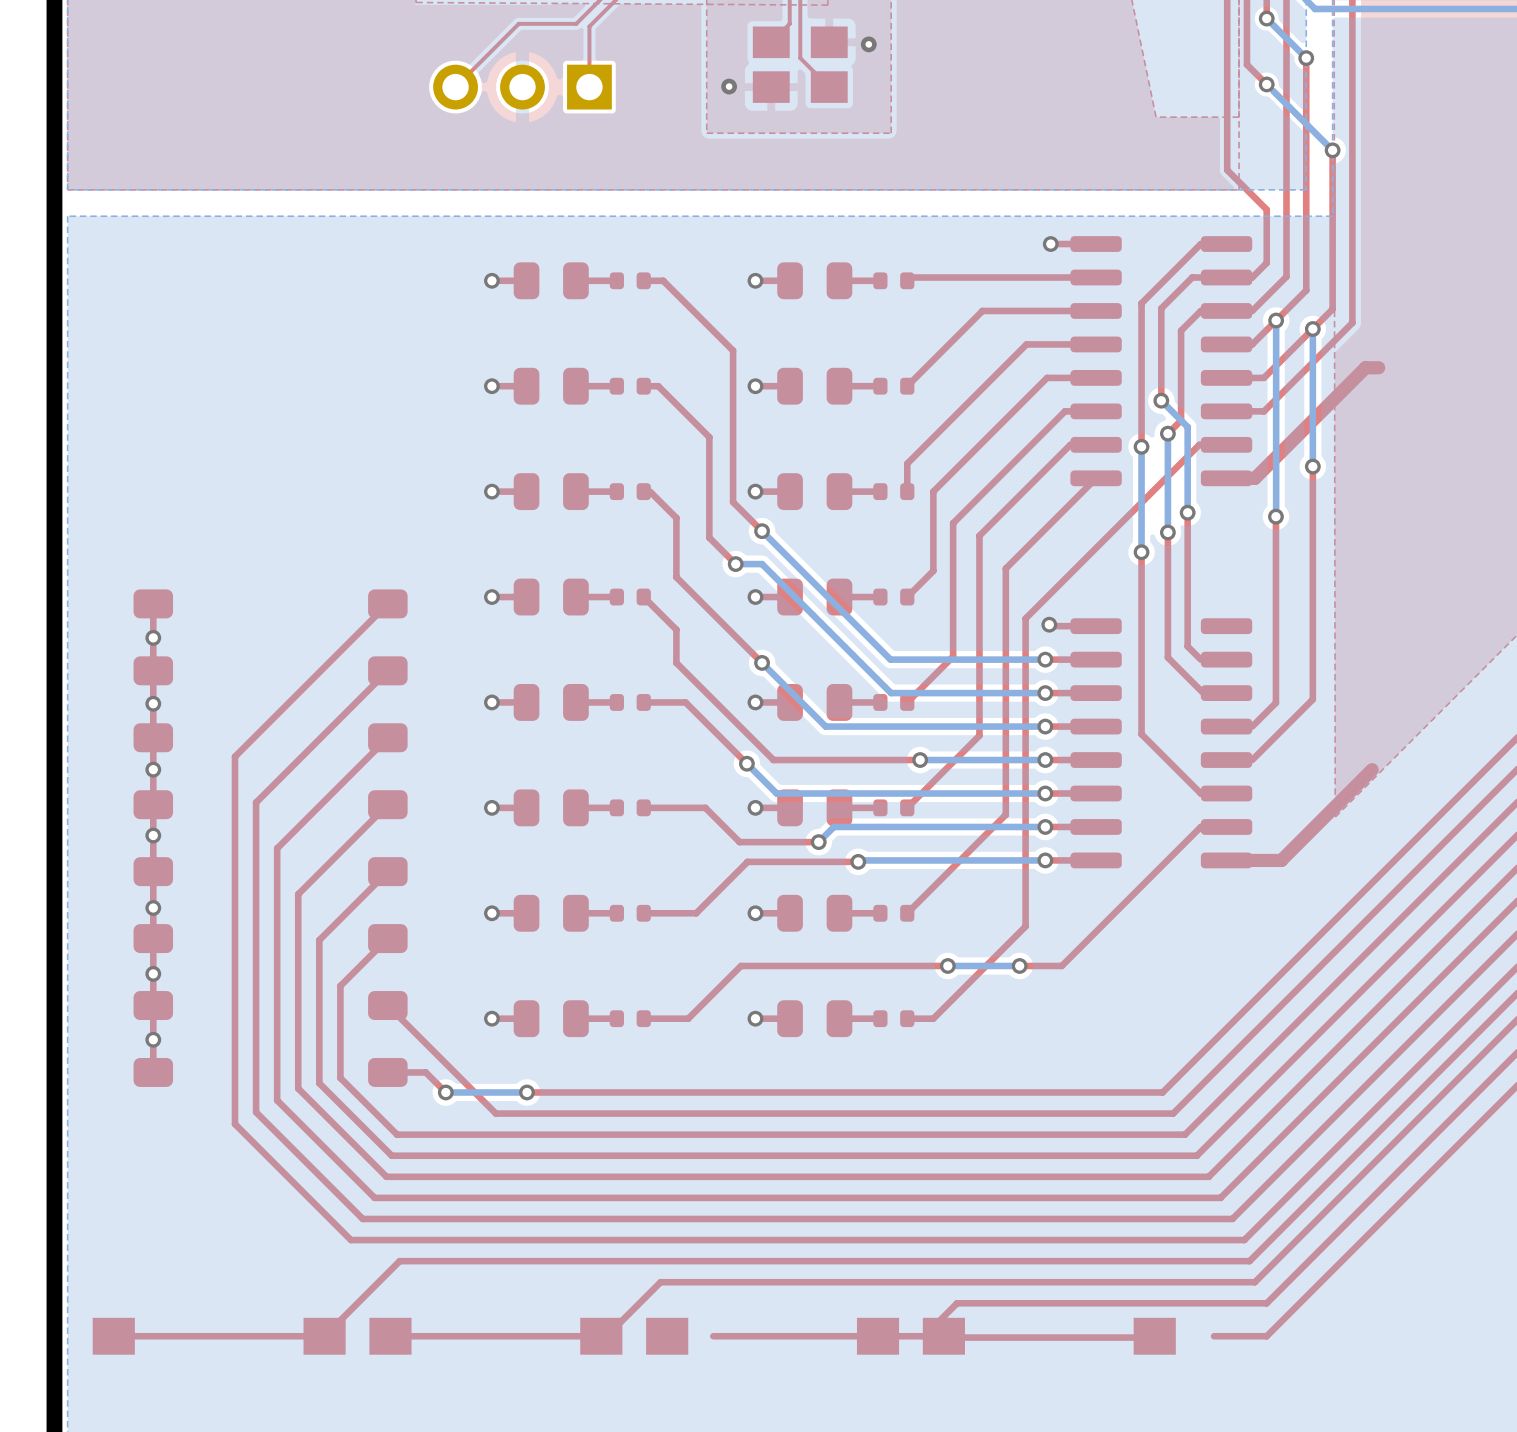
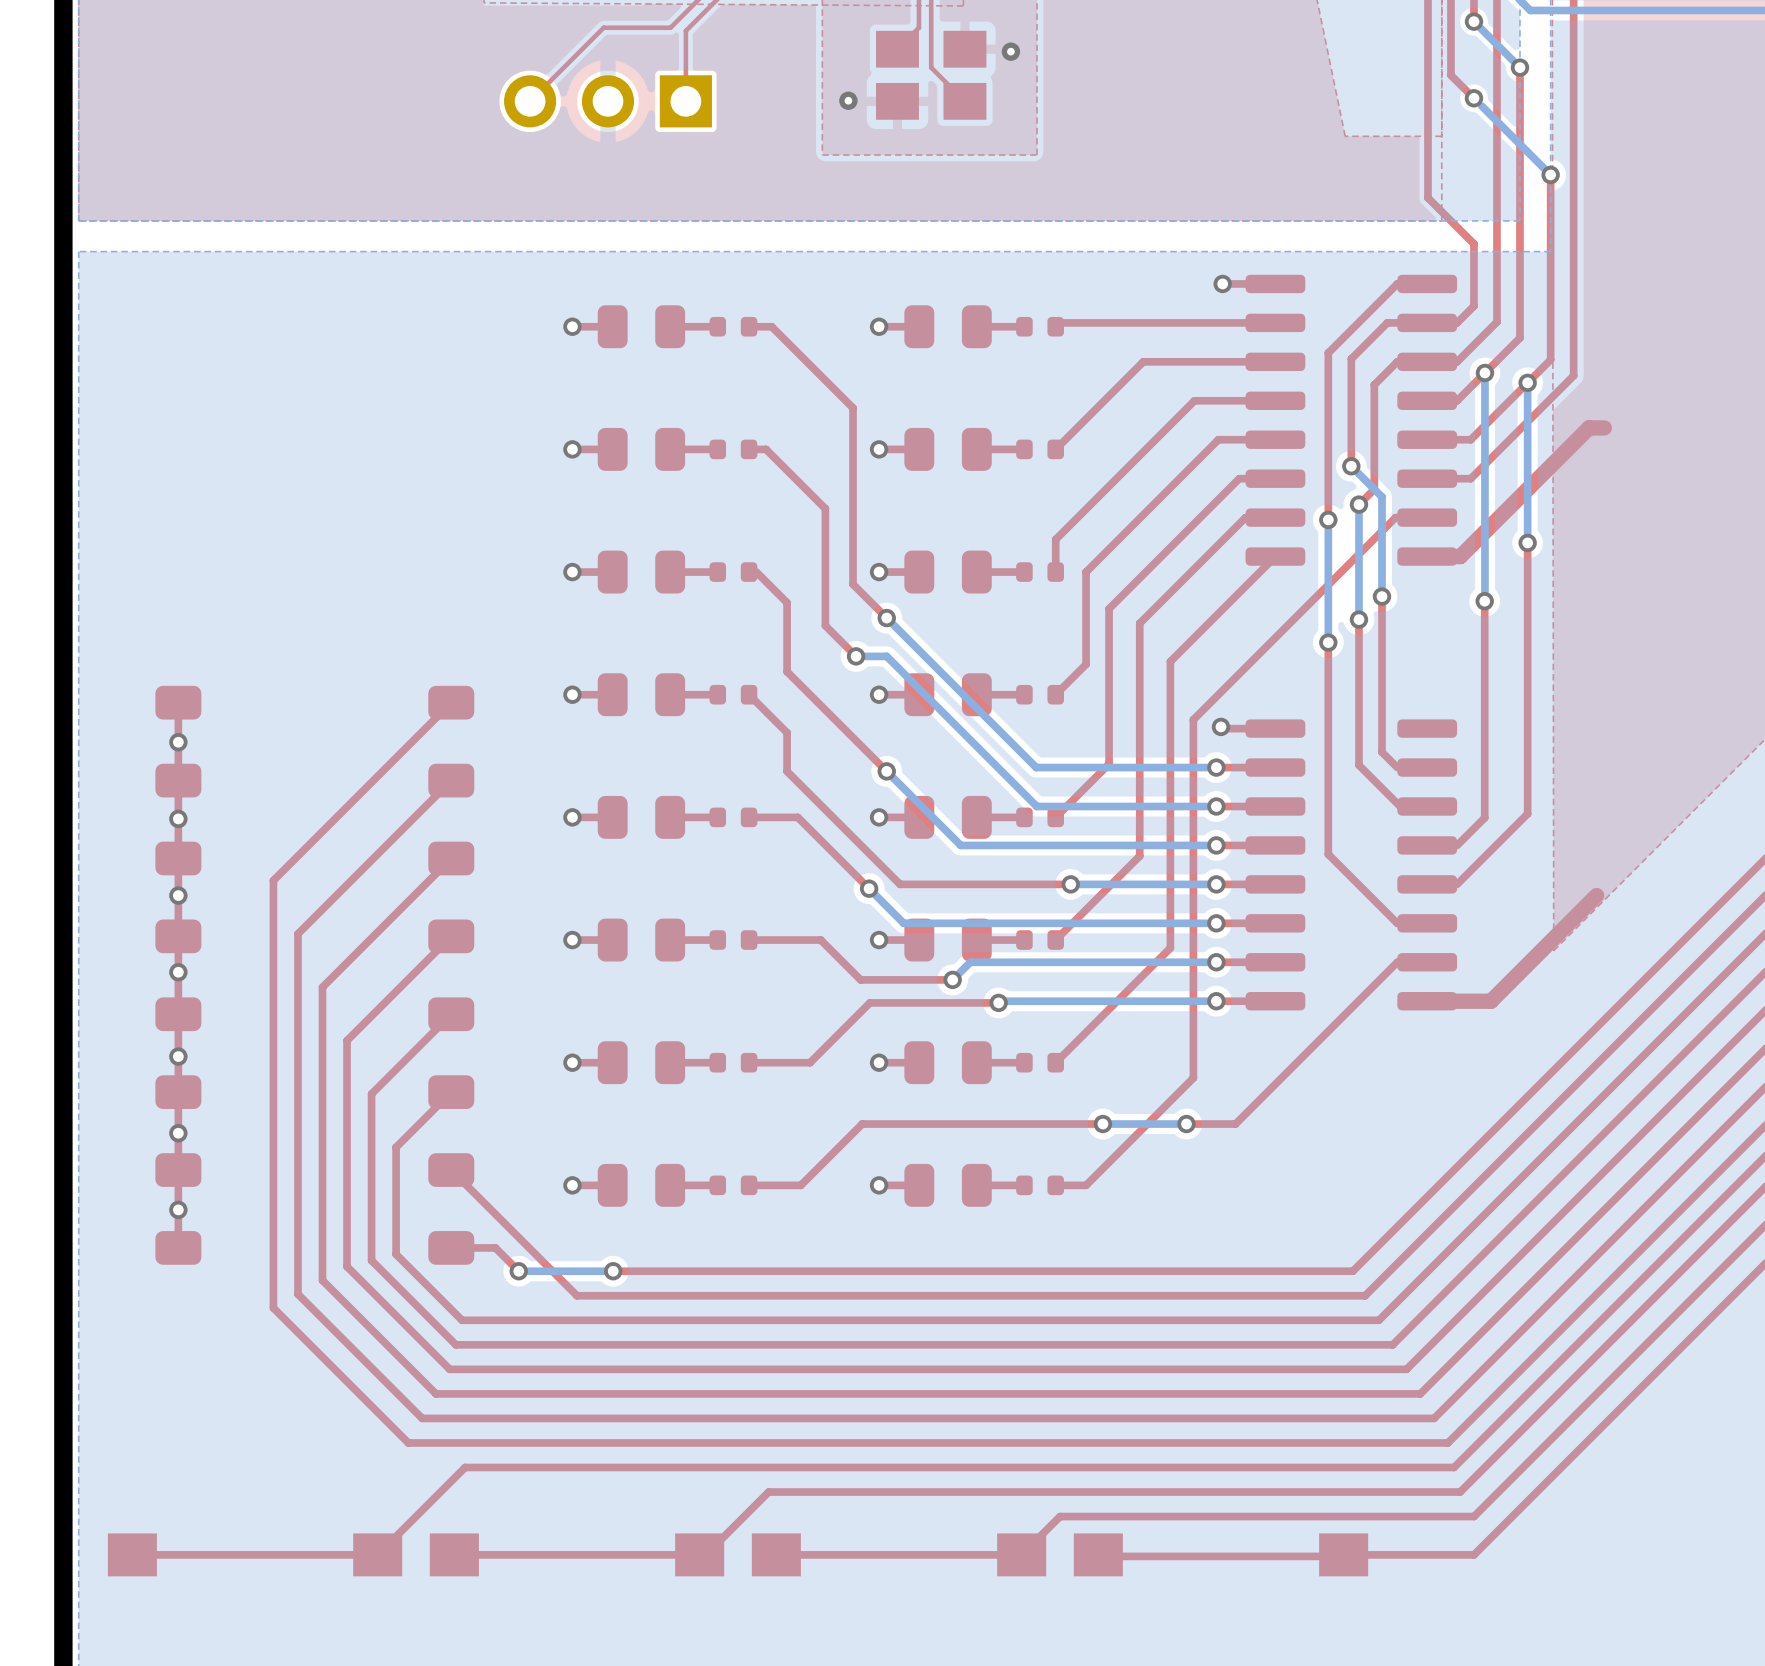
top track: (957, 1303) (924, 1336) (878, 1336) -> (1113, 1516) (1060, 1516) (1021, 1554)
top track: none -> (830, 1554) (776, 1554)
top track: none -> (1412, 1554) (1343, 1554)

